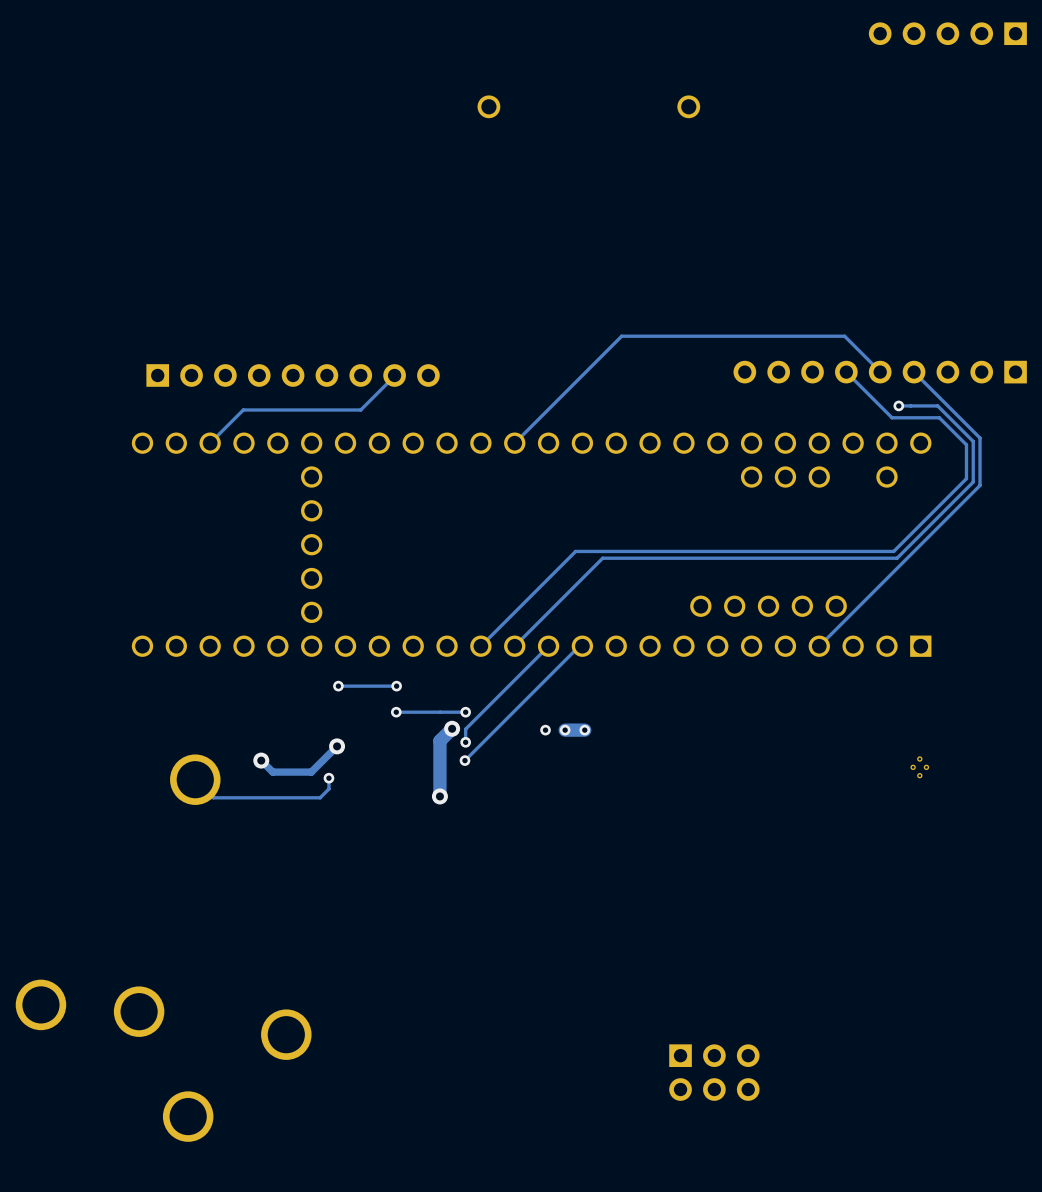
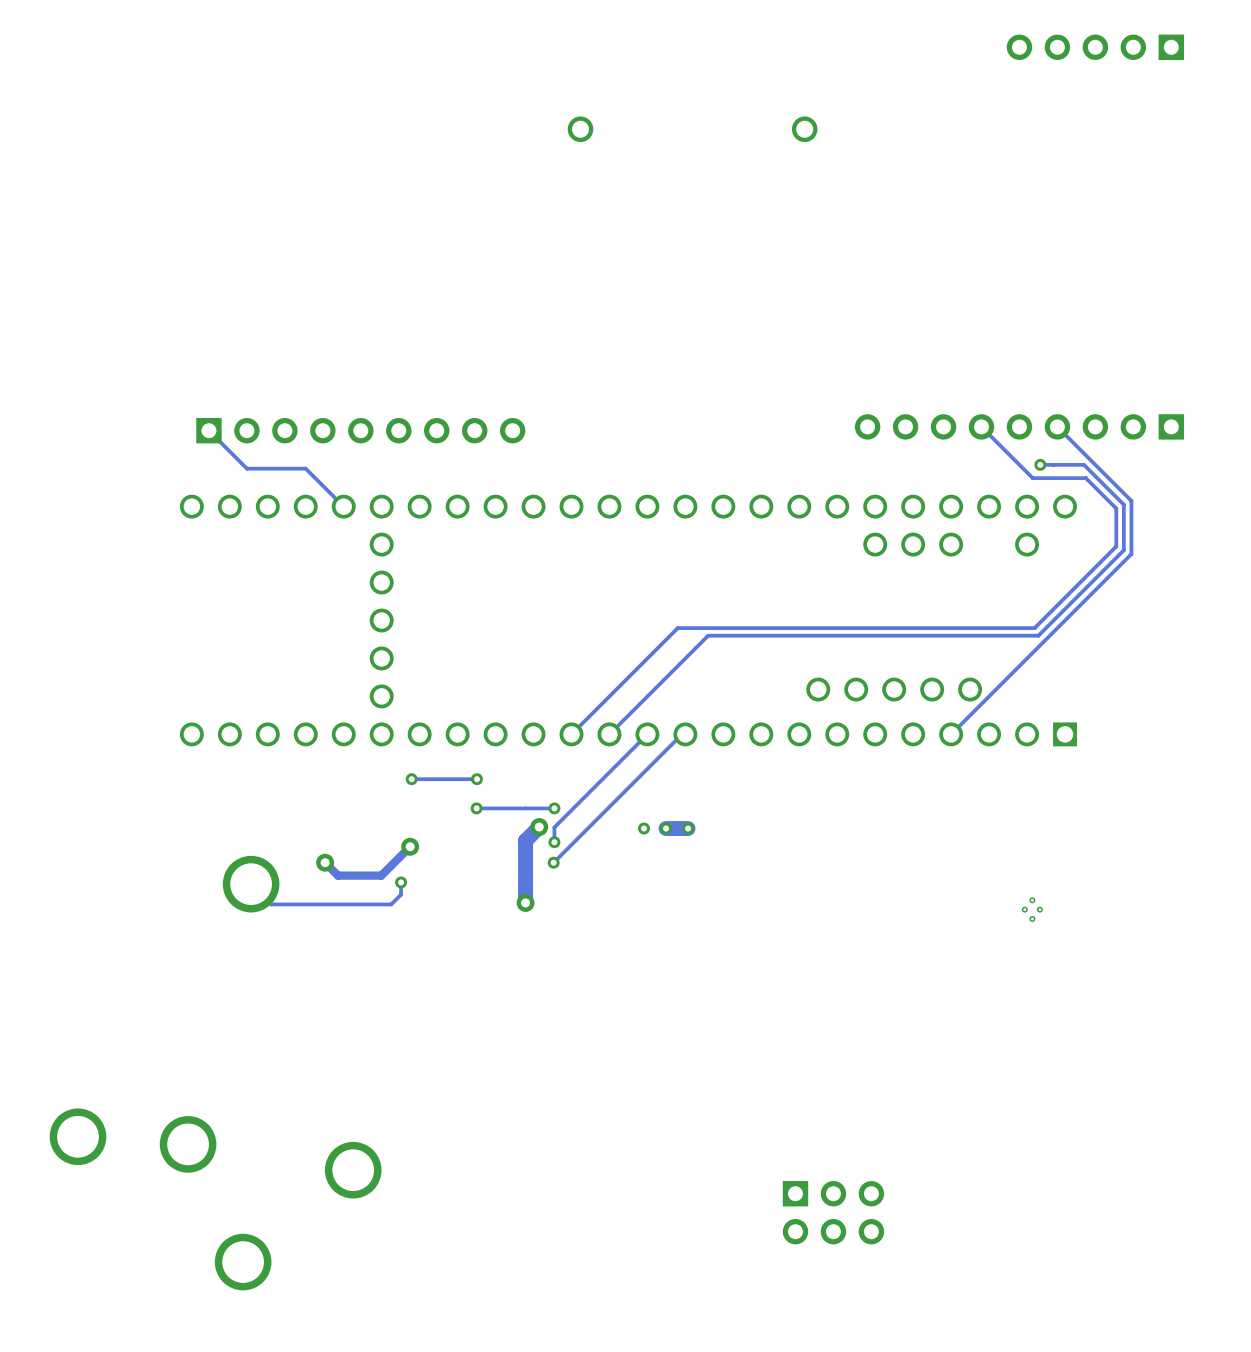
track: (880, 372) (844, 336) (621, 336) (514, 443) -> none
track: none -> (208, 430) (246, 468) (305, 468) (343, 506)
track: (394, 375) (360, 410) (243, 410) (210, 443) -> none
part position: (919, 767) -> (1032, 909)

